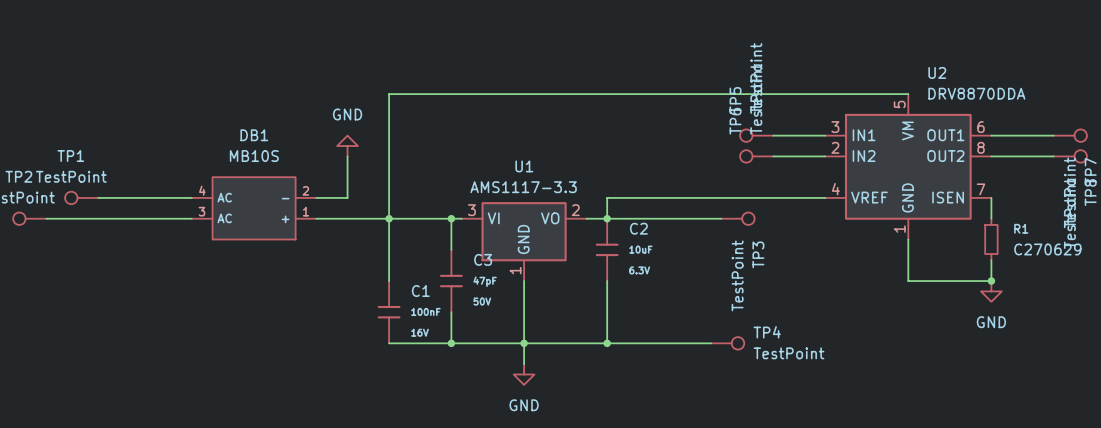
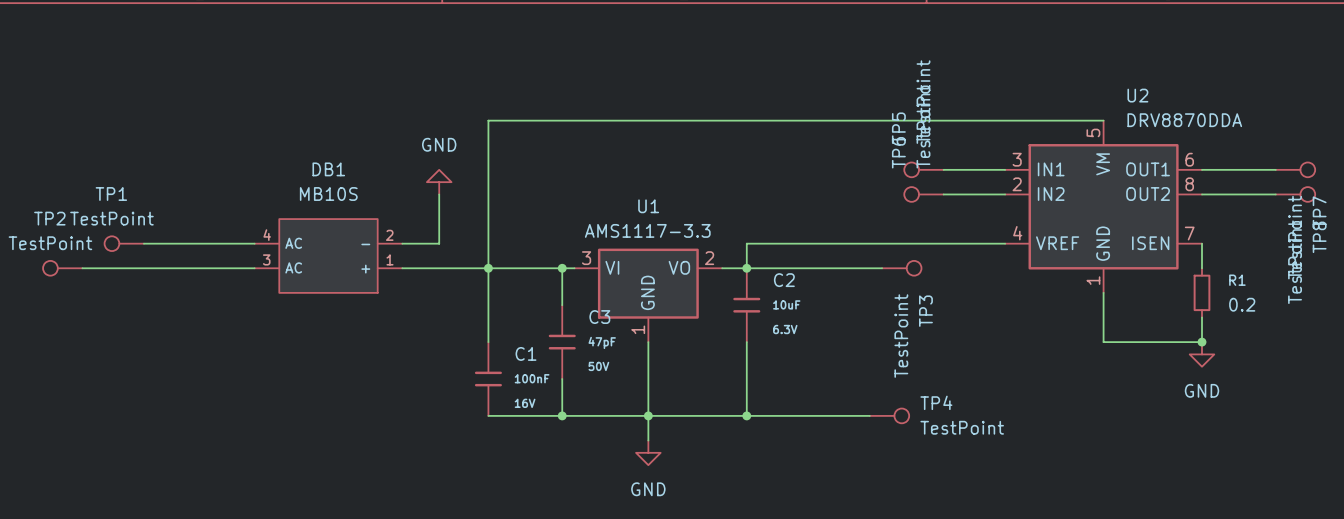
R1 value: C270629 (1047, 249) -> 0.2 (1242, 304)

